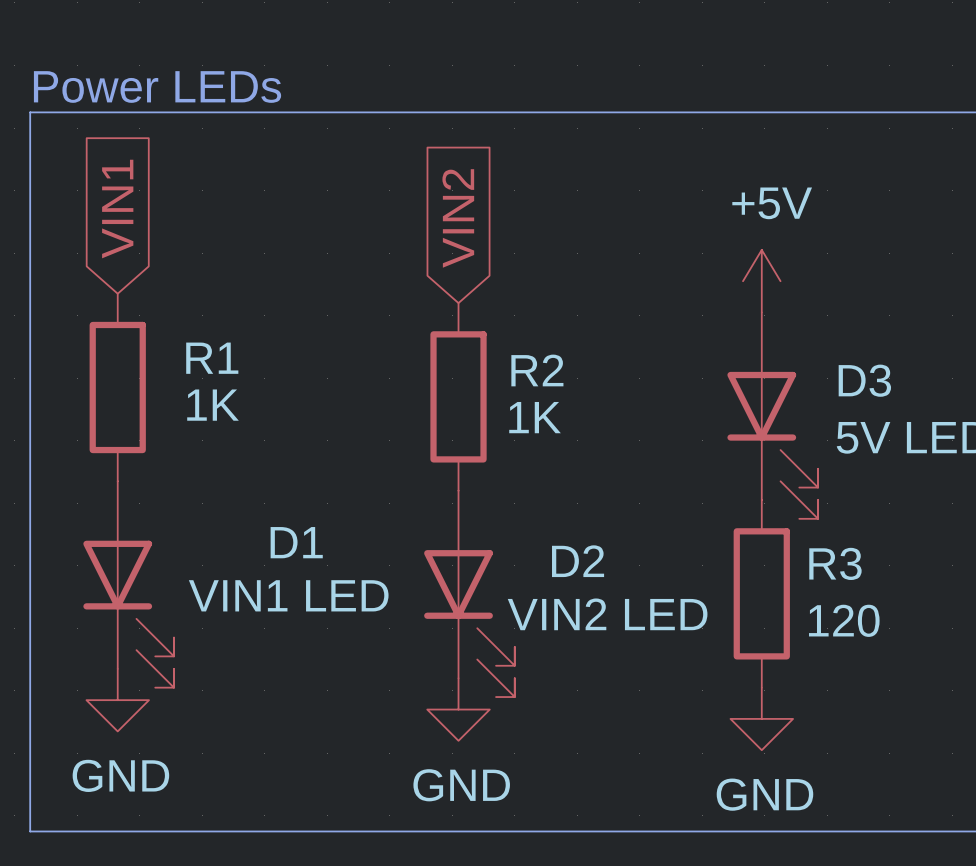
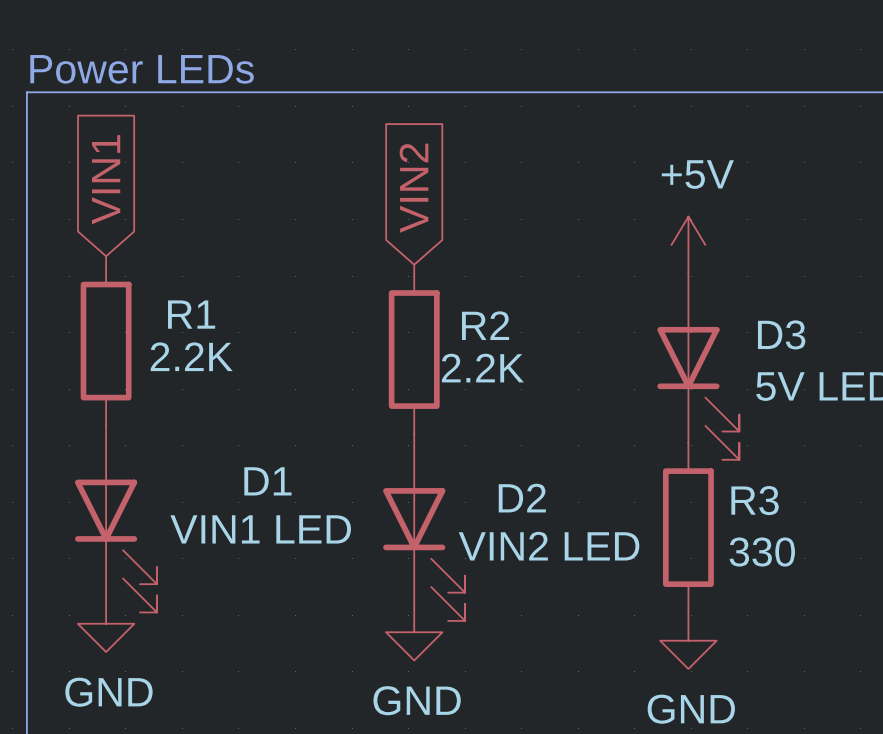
R1 value: 1K (213, 405) -> 2.2K (191, 356)
R2 value: 1K (535, 417) -> 2.2K (482, 368)
R3 value: 120 (844, 620) -> 330 (762, 552)

